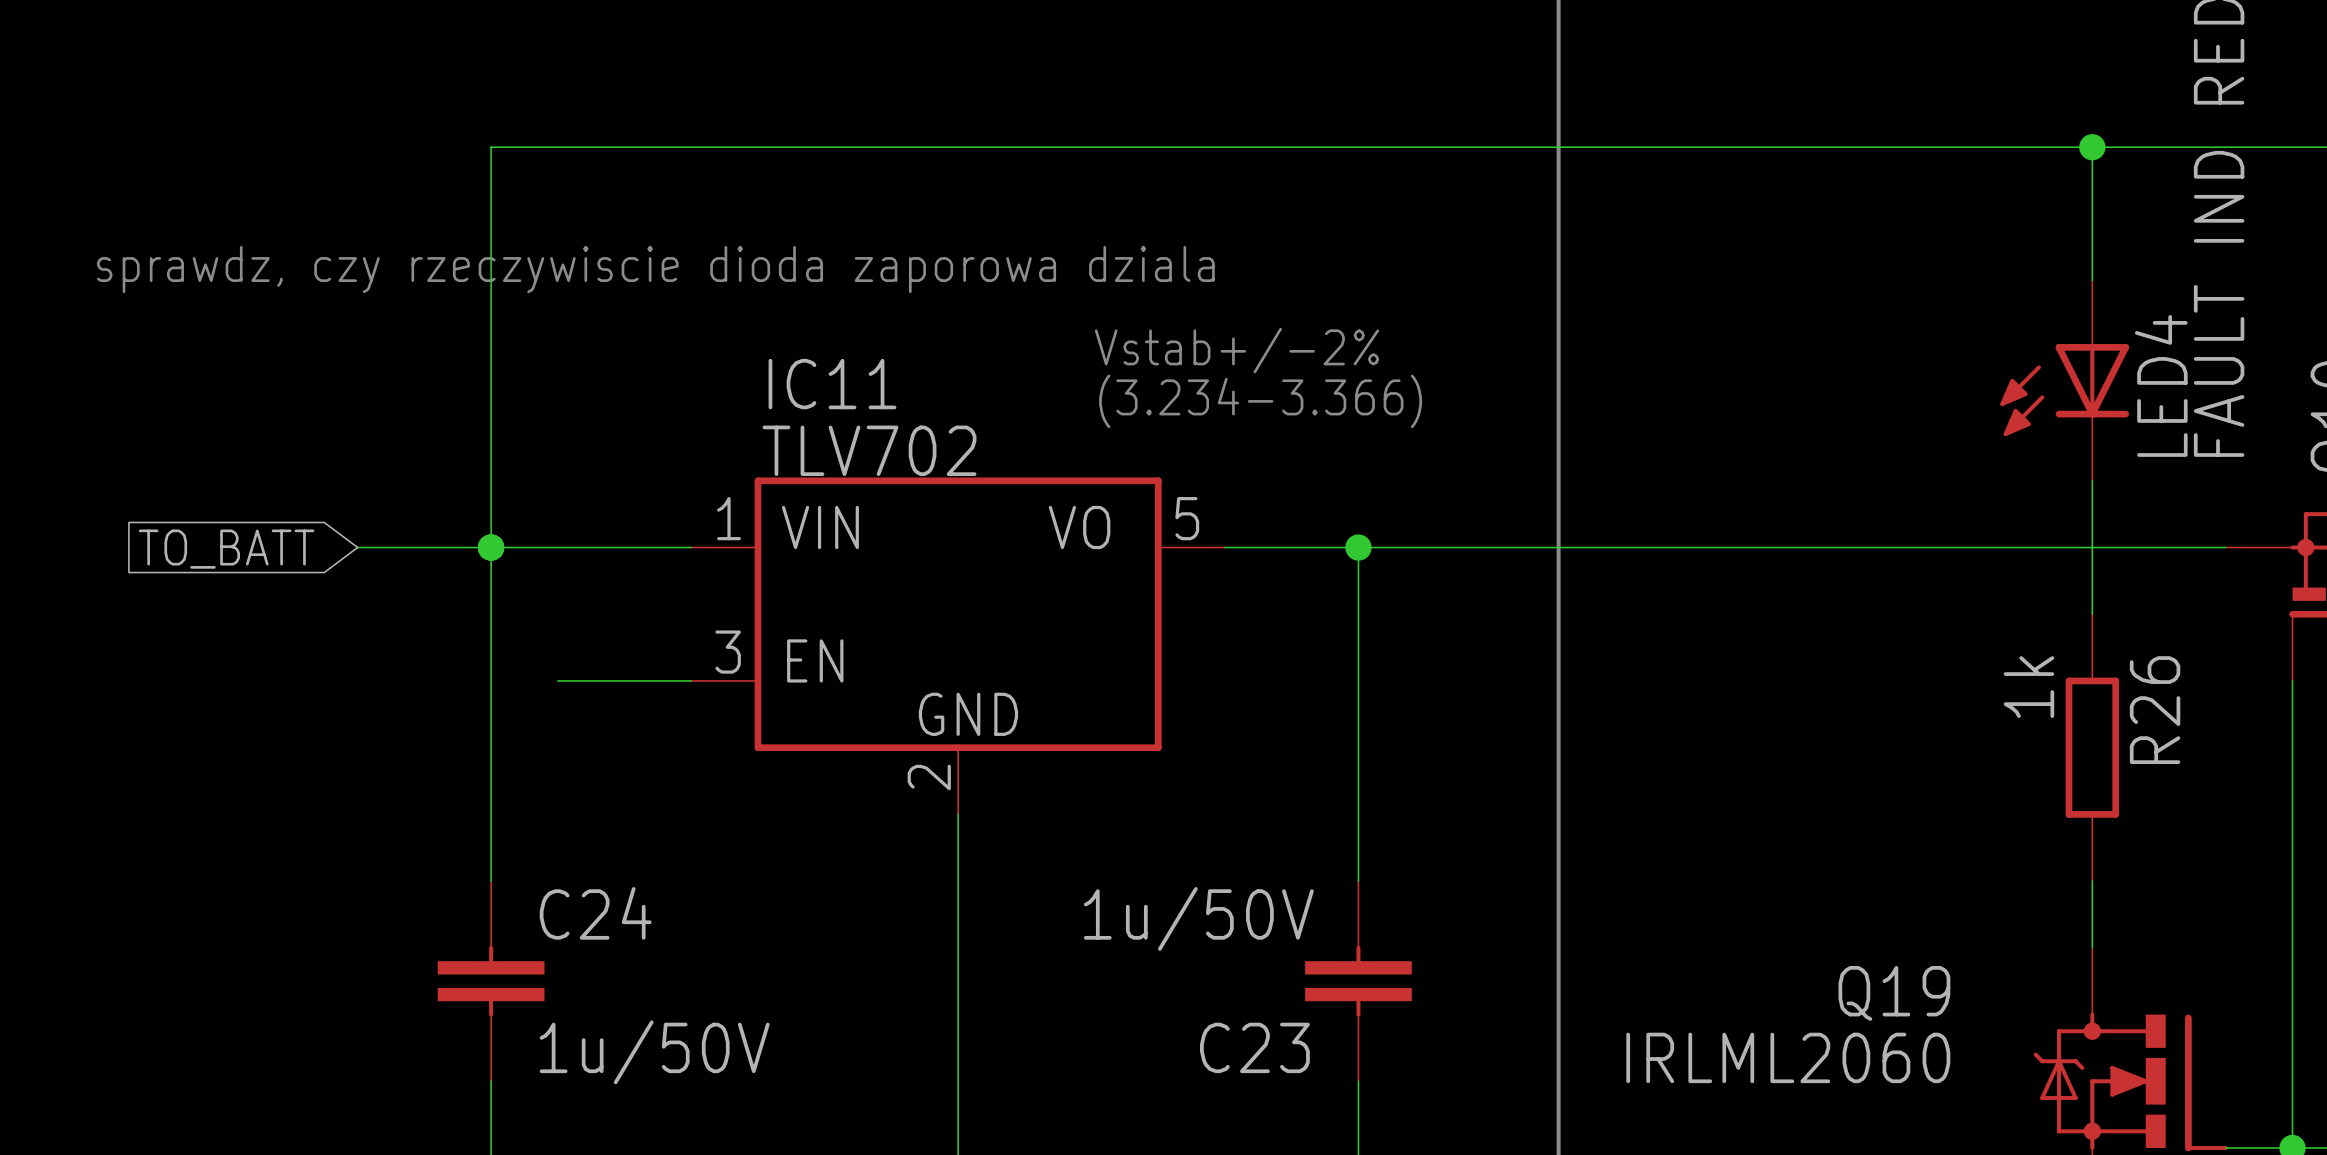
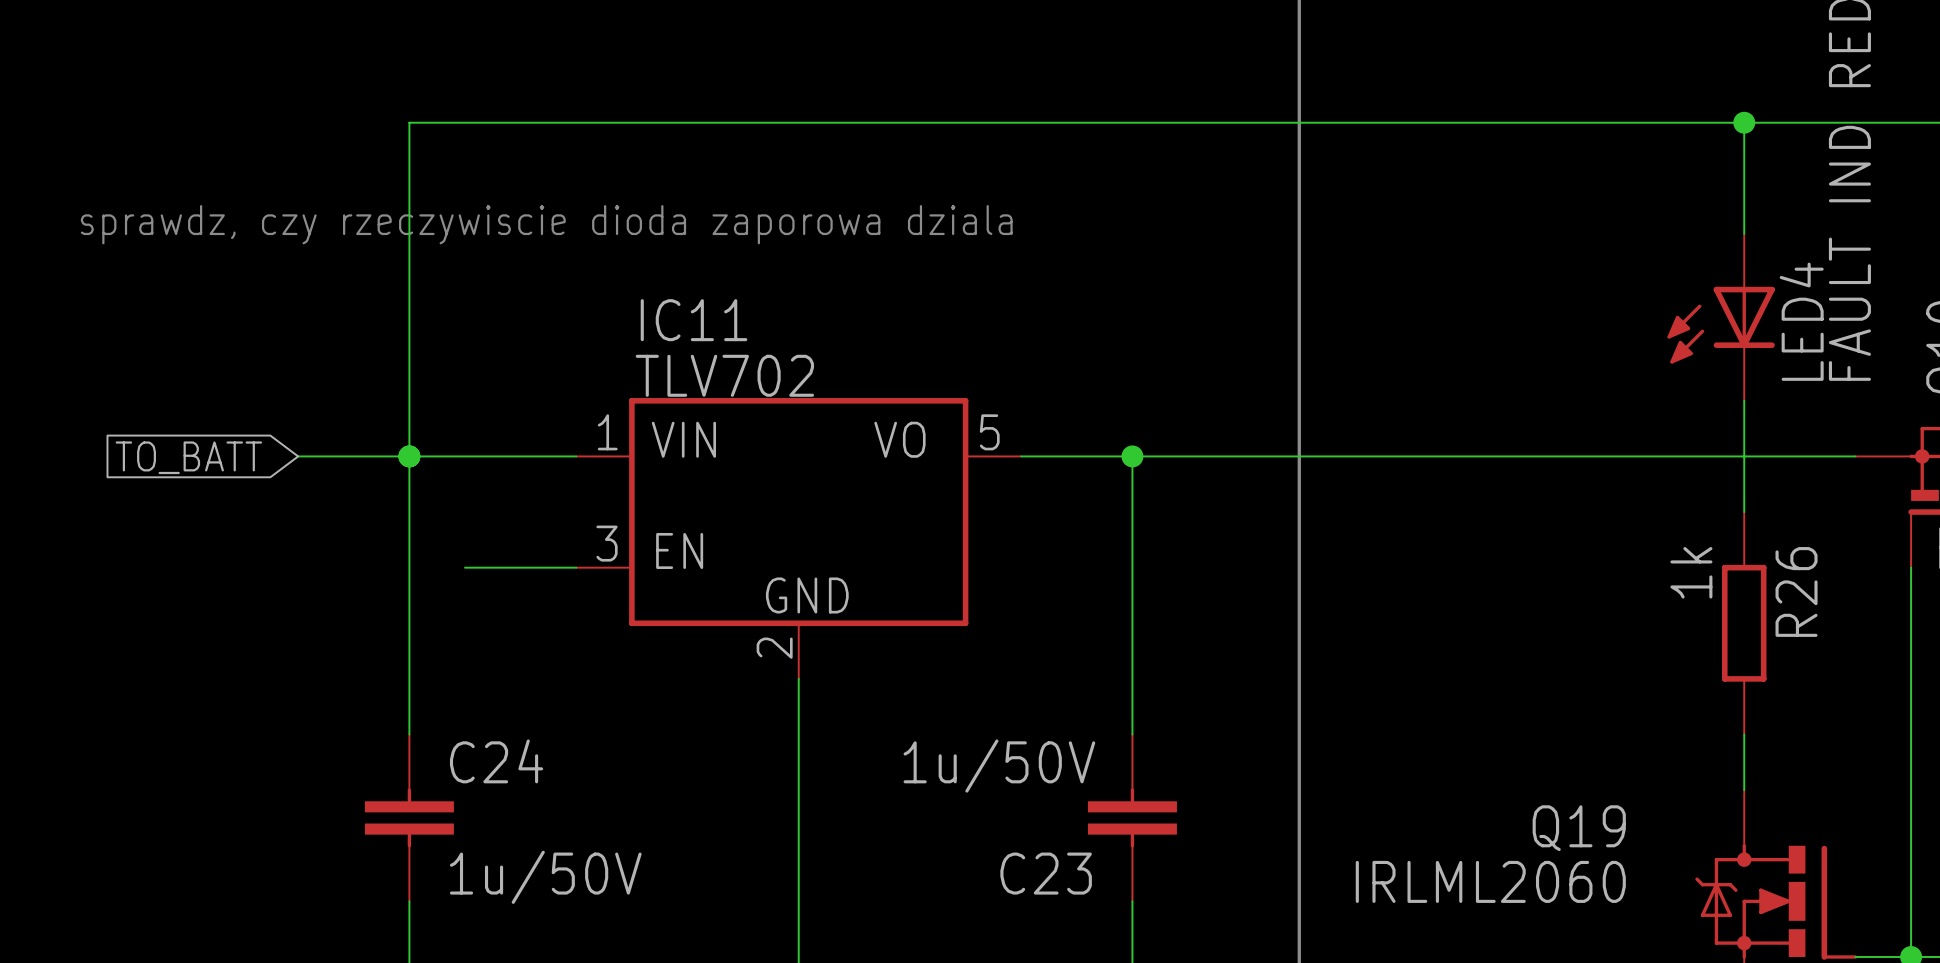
text: Vstab+/-2% (1237, 350) -> none
text: (3.234-3.366) (1260, 401) -> none

